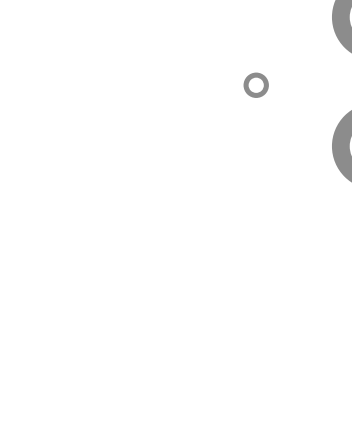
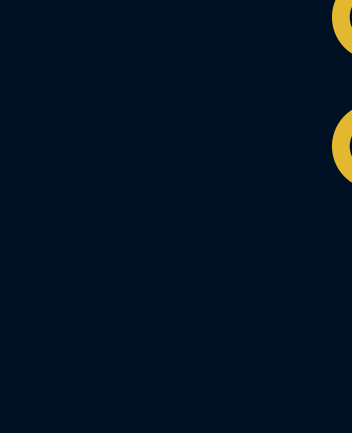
via: (256, 85) -> none

